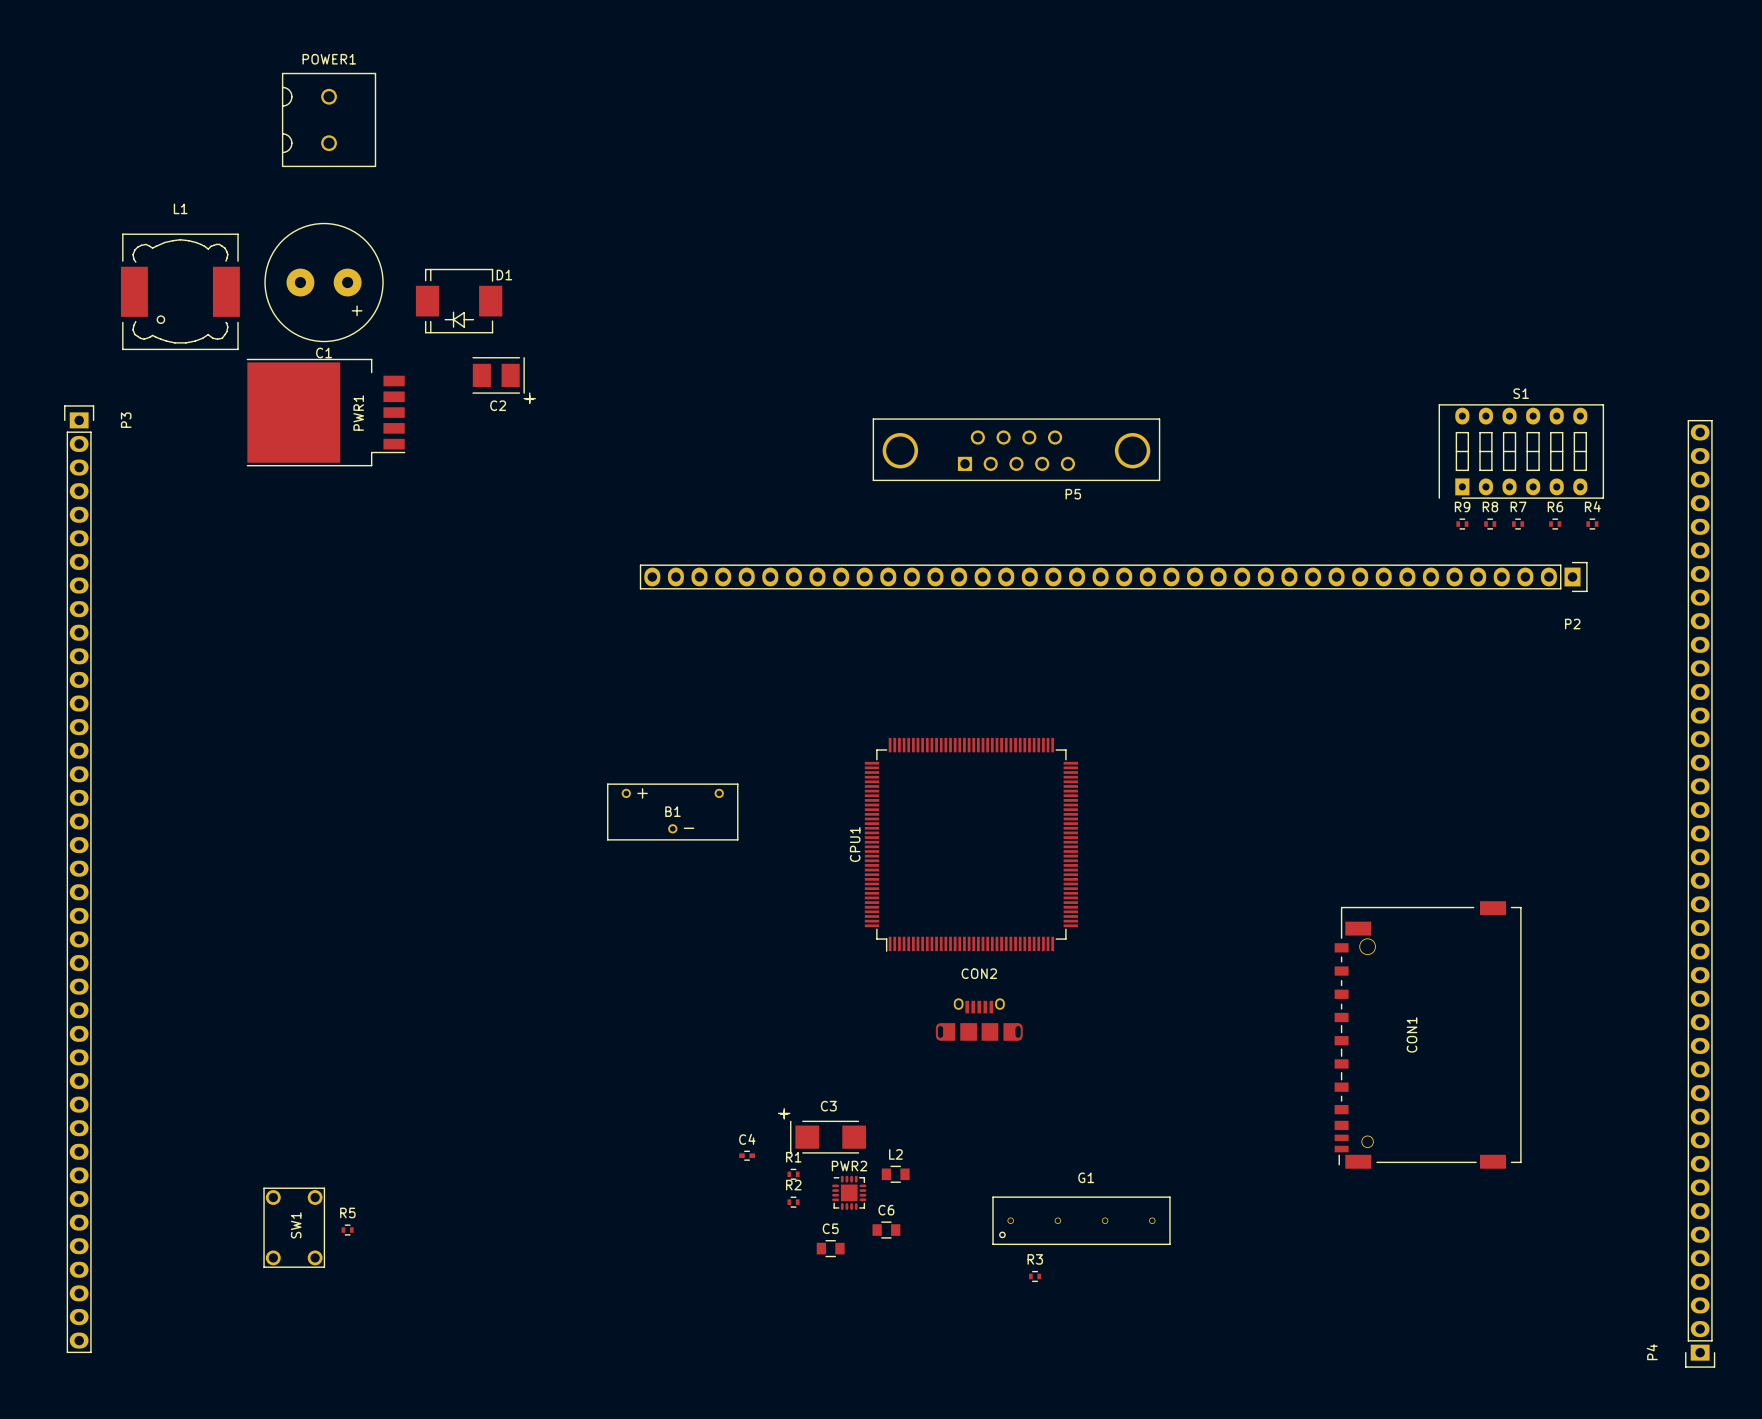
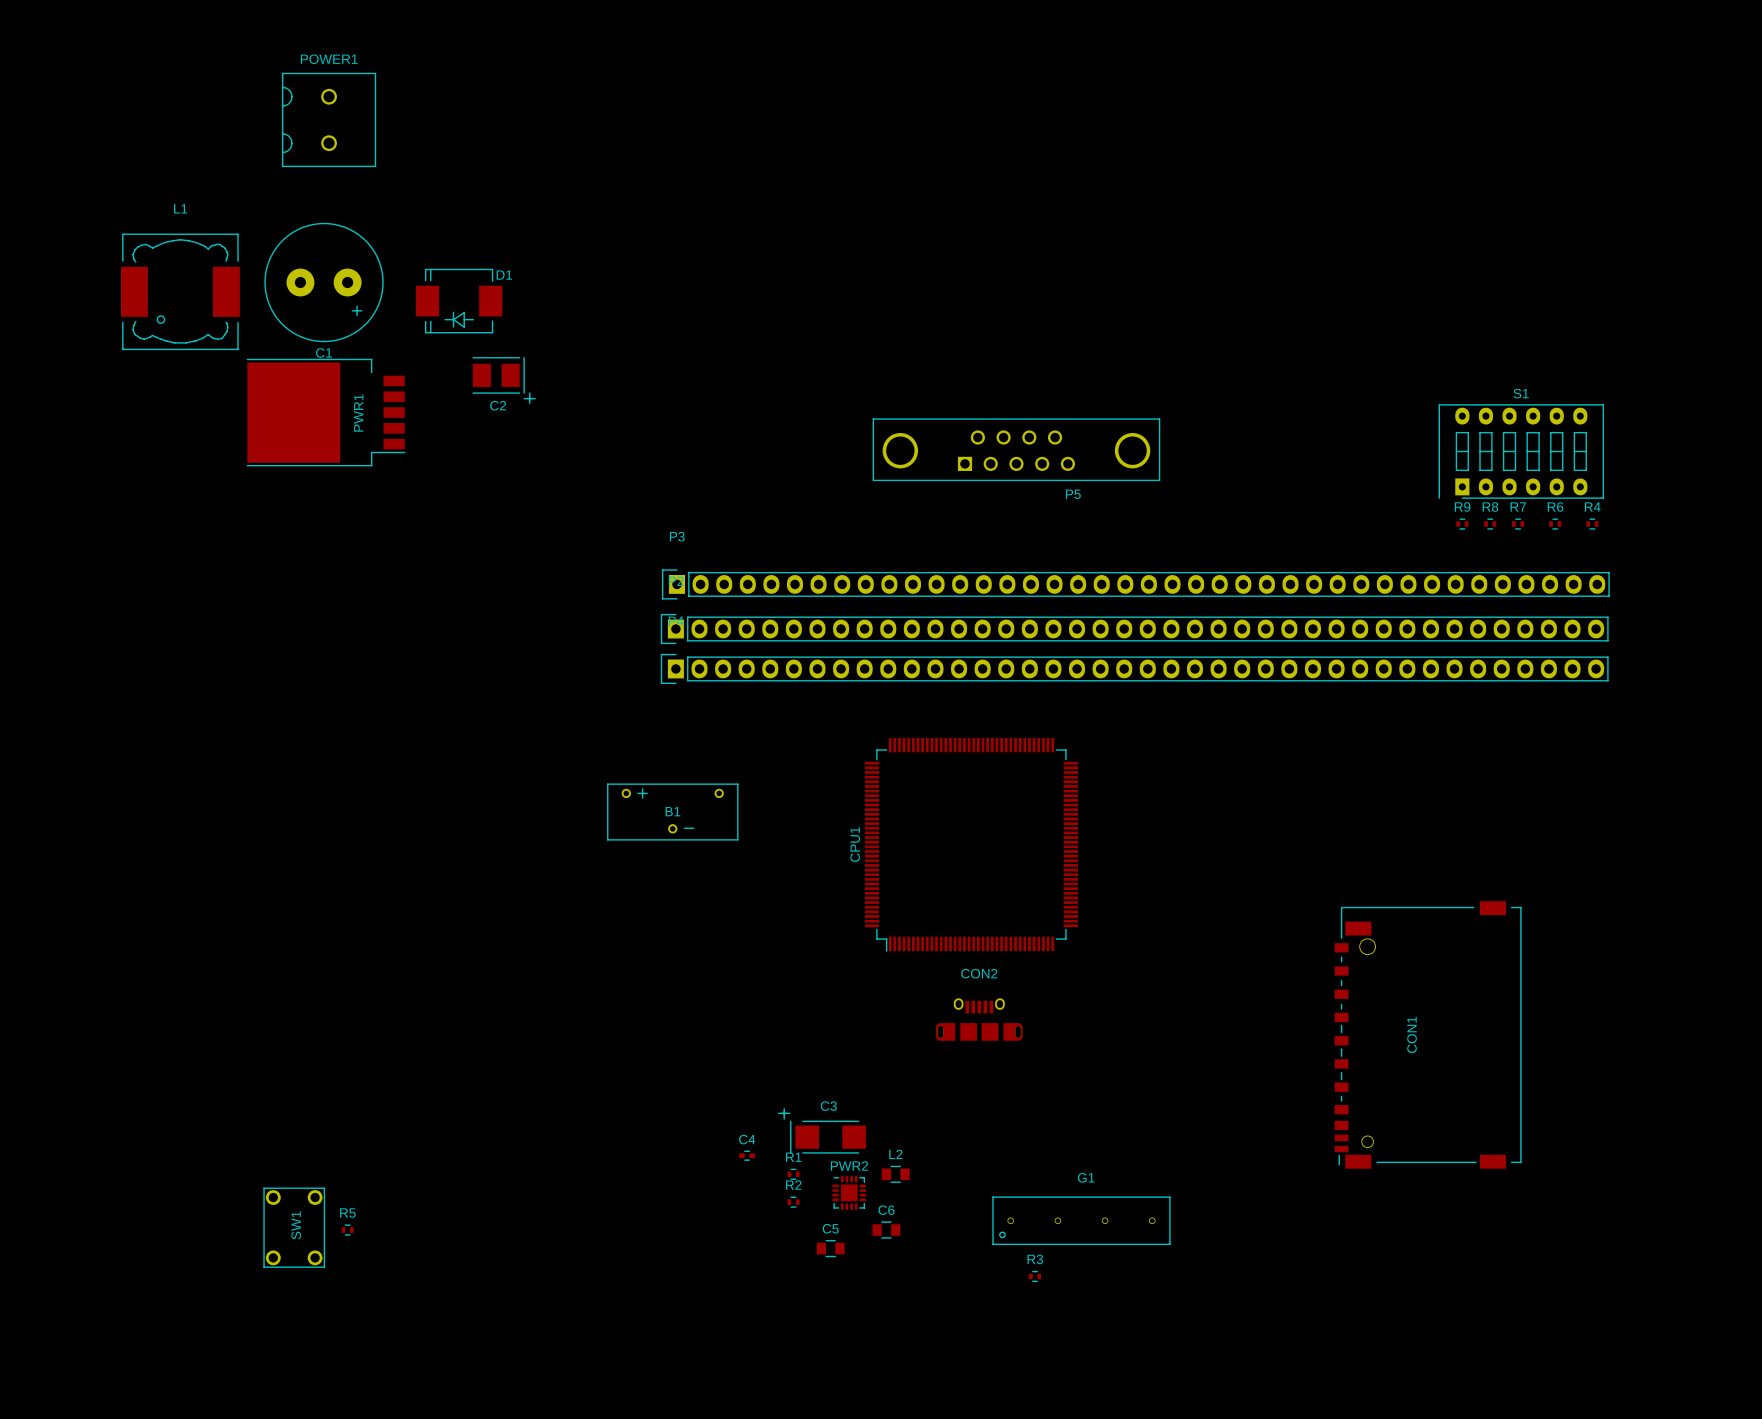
P2 rotation: 0° (1113, 576) -> 180° (1134, 629)
P3 rotation: 0° (79, 879) -> 90° counterclockwise (1135, 584)
P3 position: (79, 879) -> (1135, 584)
P4 rotation: 0° (1700, 893) -> 90° clockwise (1134, 668)
P4 position: (1700, 893) -> (1134, 668)

